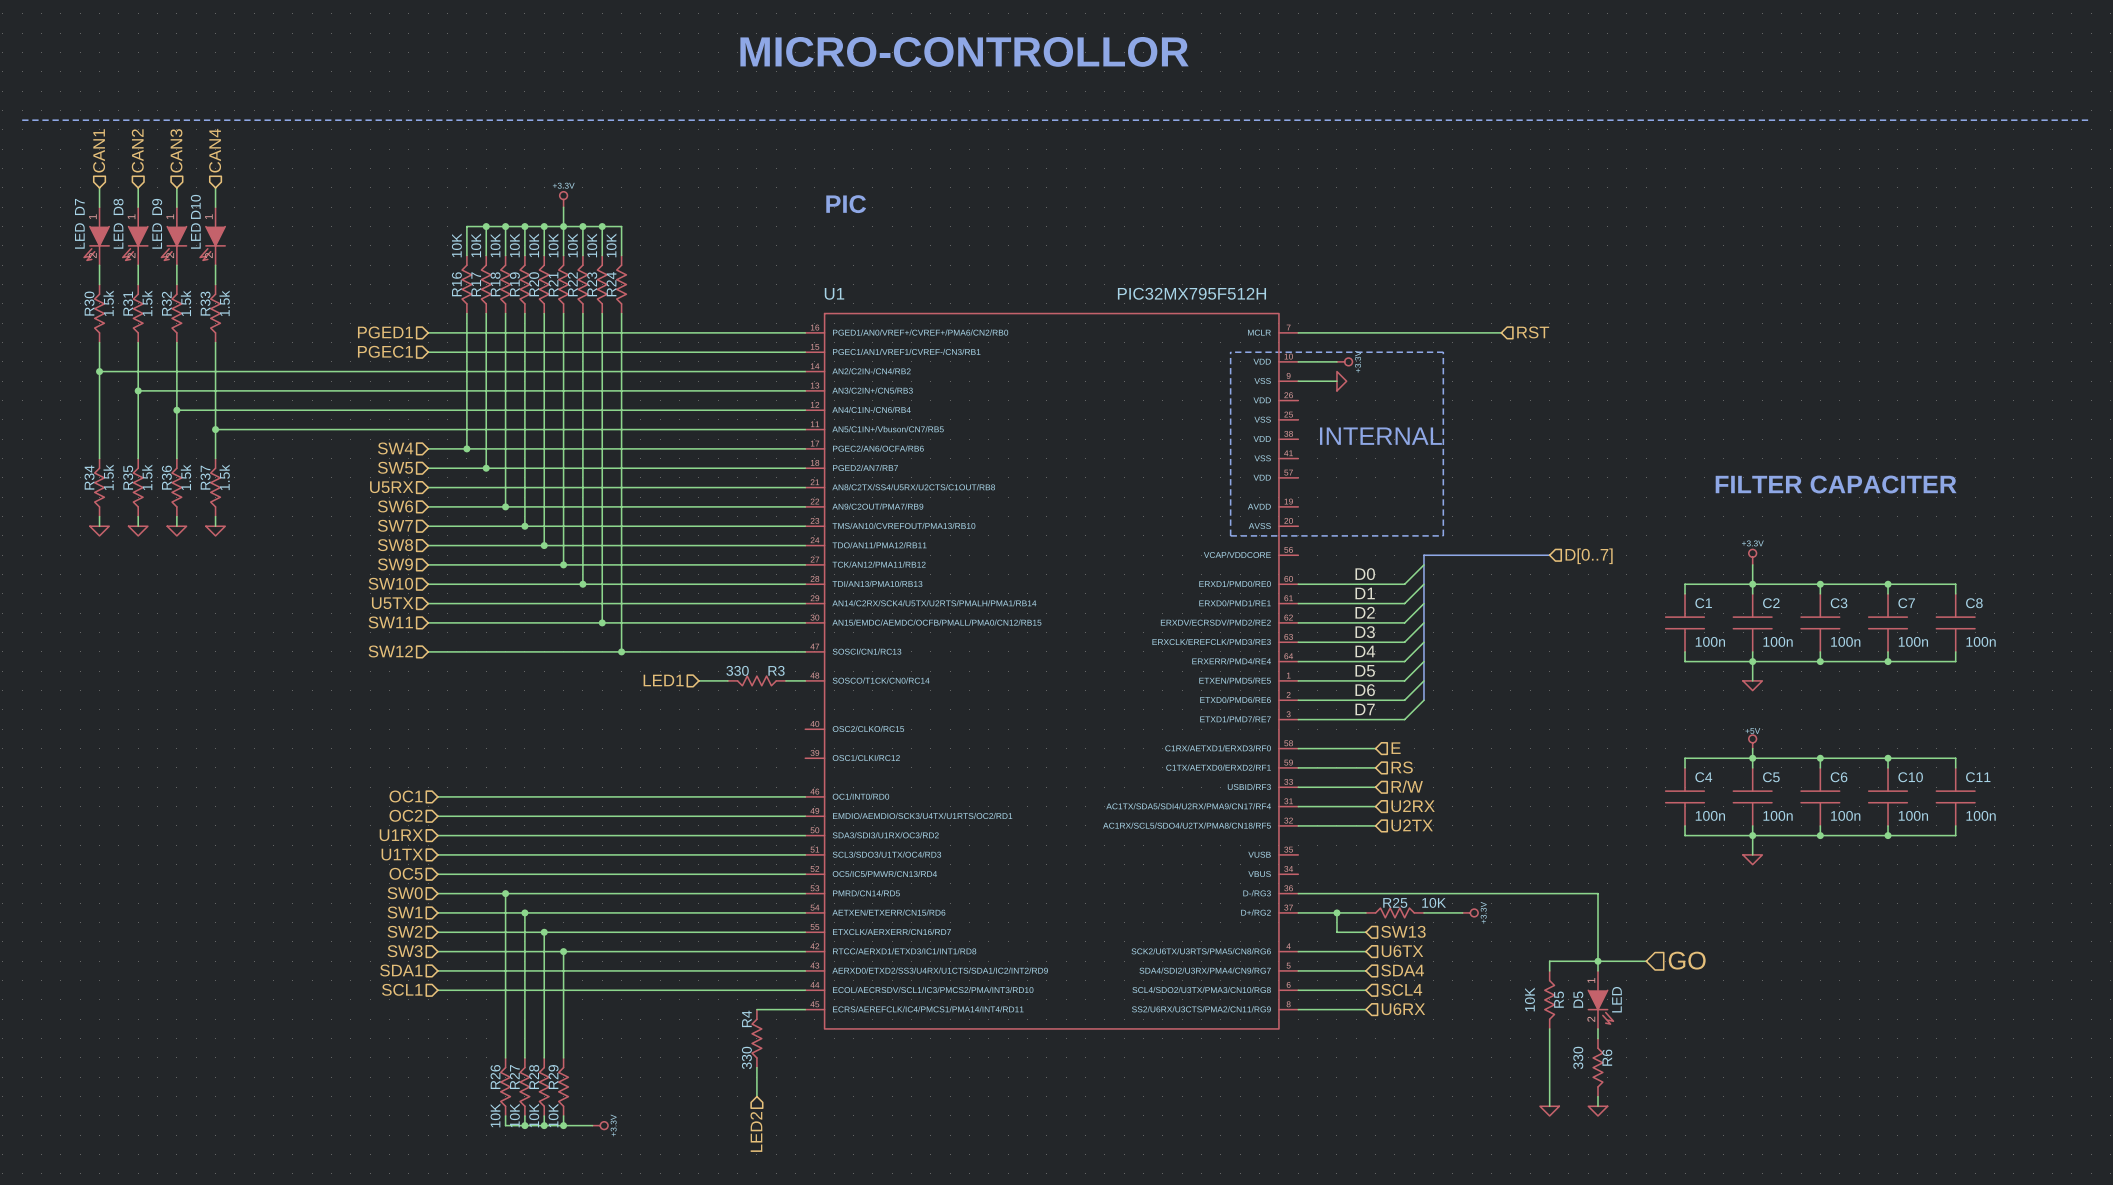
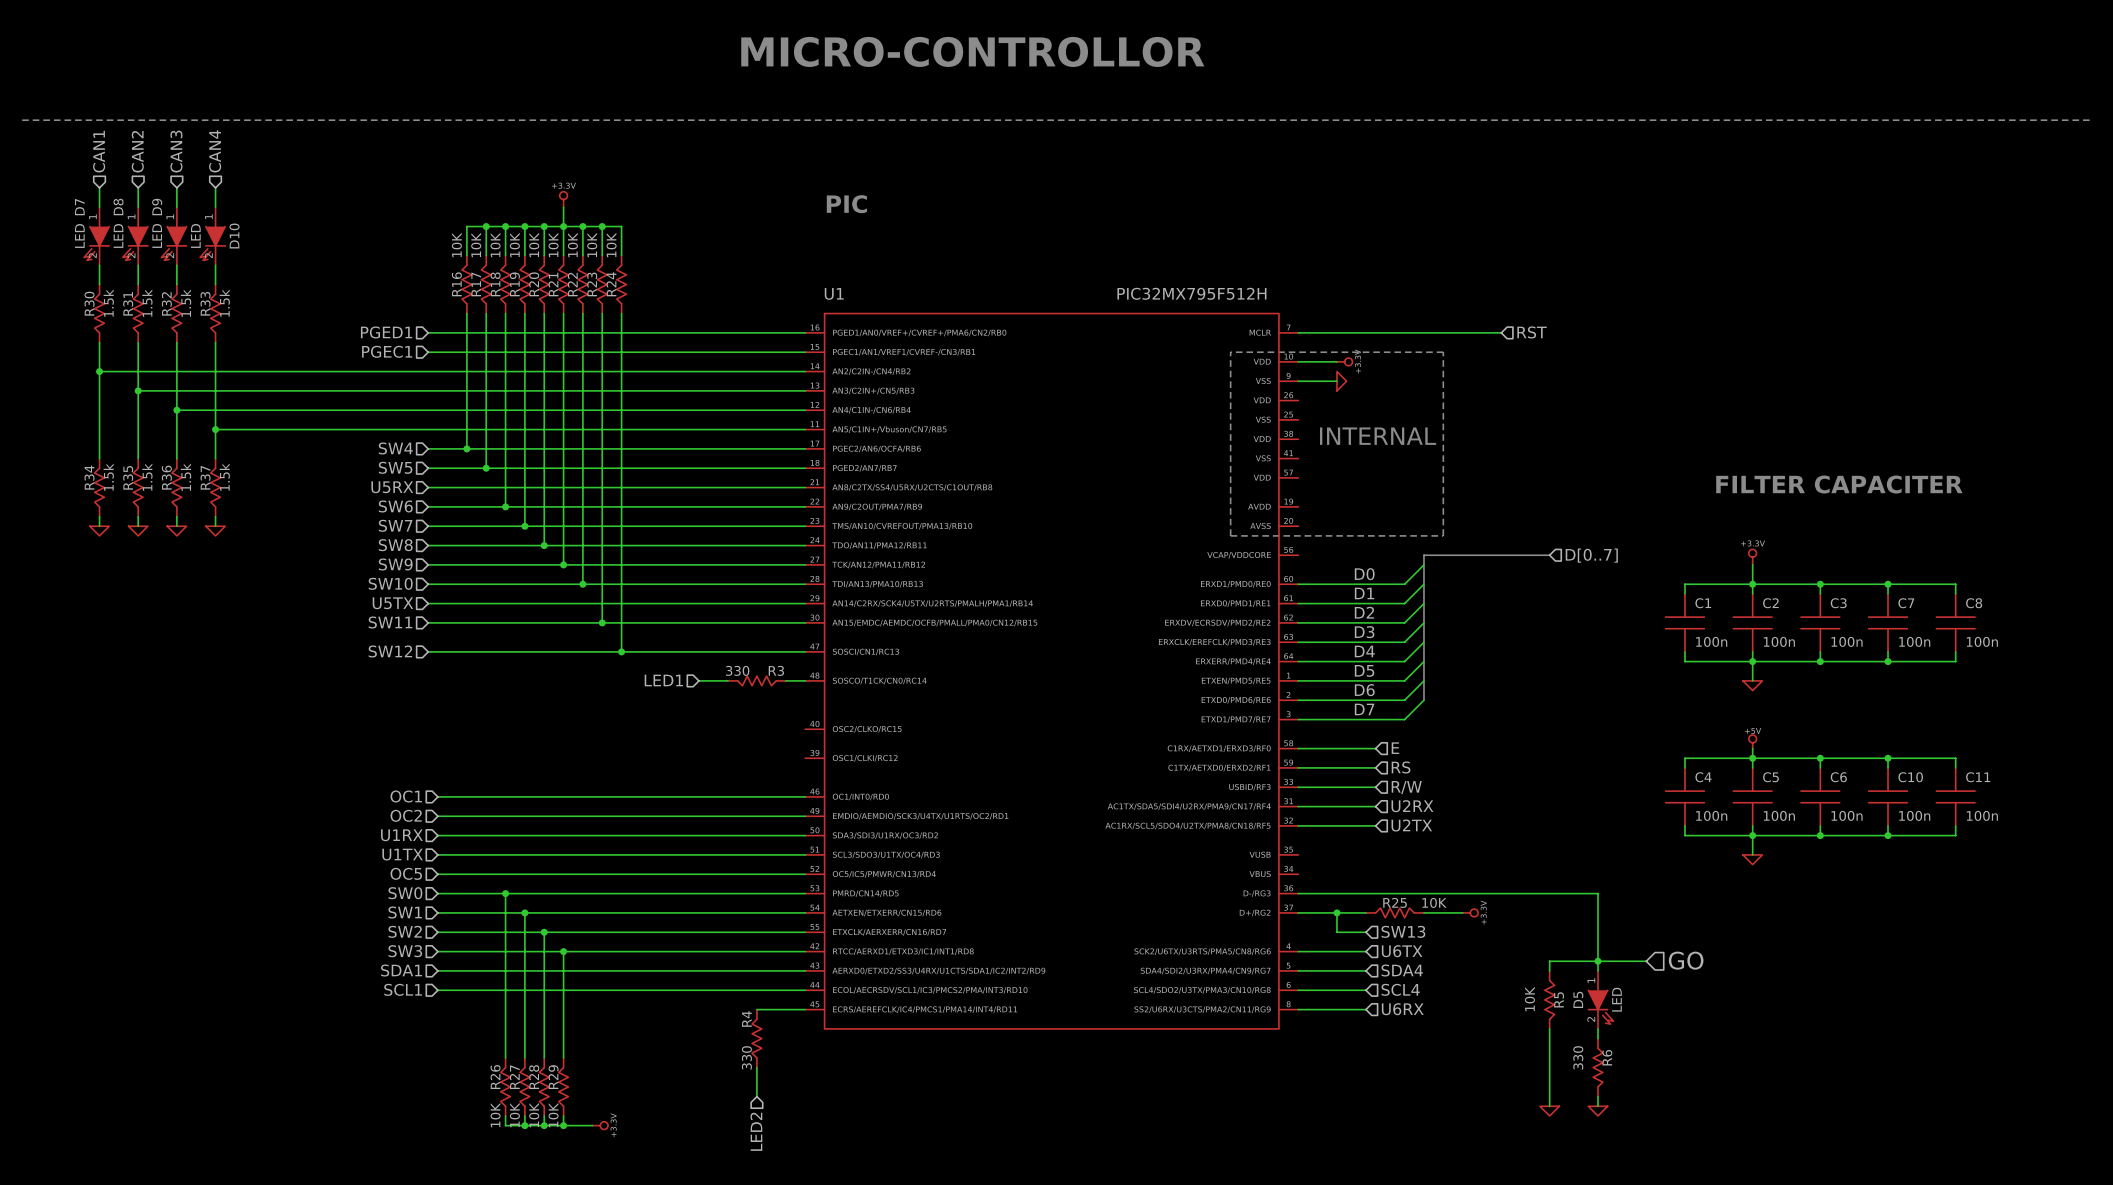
D10 name position: D10 (195, 206) -> D10 (234, 236)

